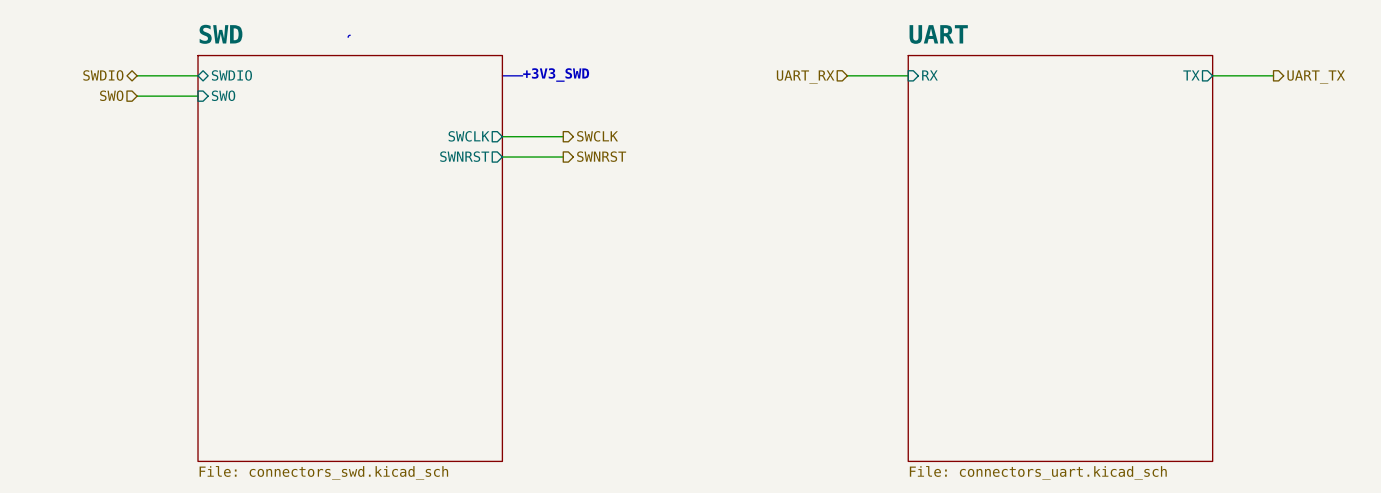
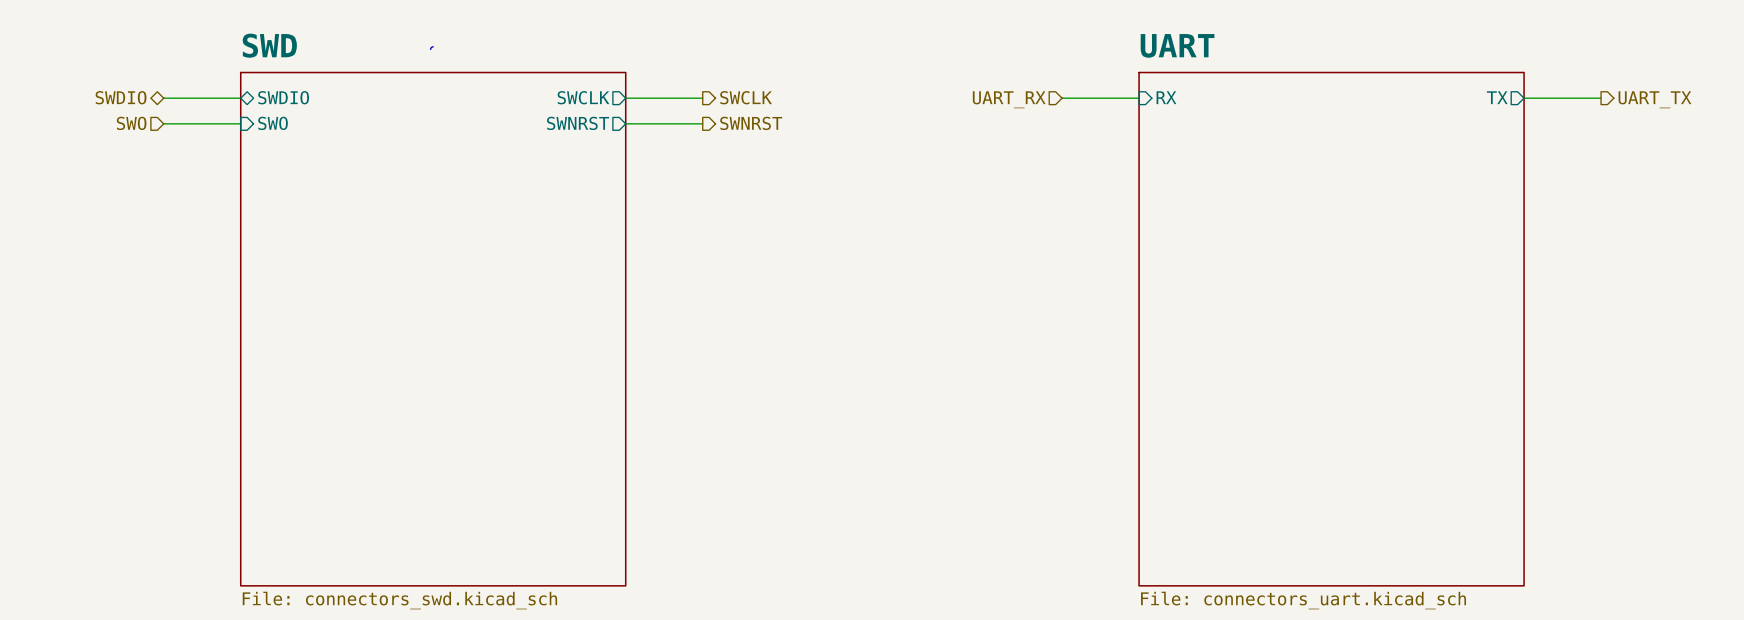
line: (502, 75) (522, 75) -> none
text: +3V3_SWD (556, 75) -> none
sheet pin position: SWCLK (469, 136) -> SWCLK (583, 97)
wire: (502, 136) (563, 136) -> (625, 123) (702, 123)
hierarchical label position: SWCLK (597, 136) -> SWCLK (746, 97)
sheet pin position: SWNRST (464, 156) -> SWNRST (578, 123)
hierarchical label position: SWNRST (601, 156) -> SWNRST (751, 123)
wire: (502, 157) (563, 157) -> (625, 98) (702, 98)

